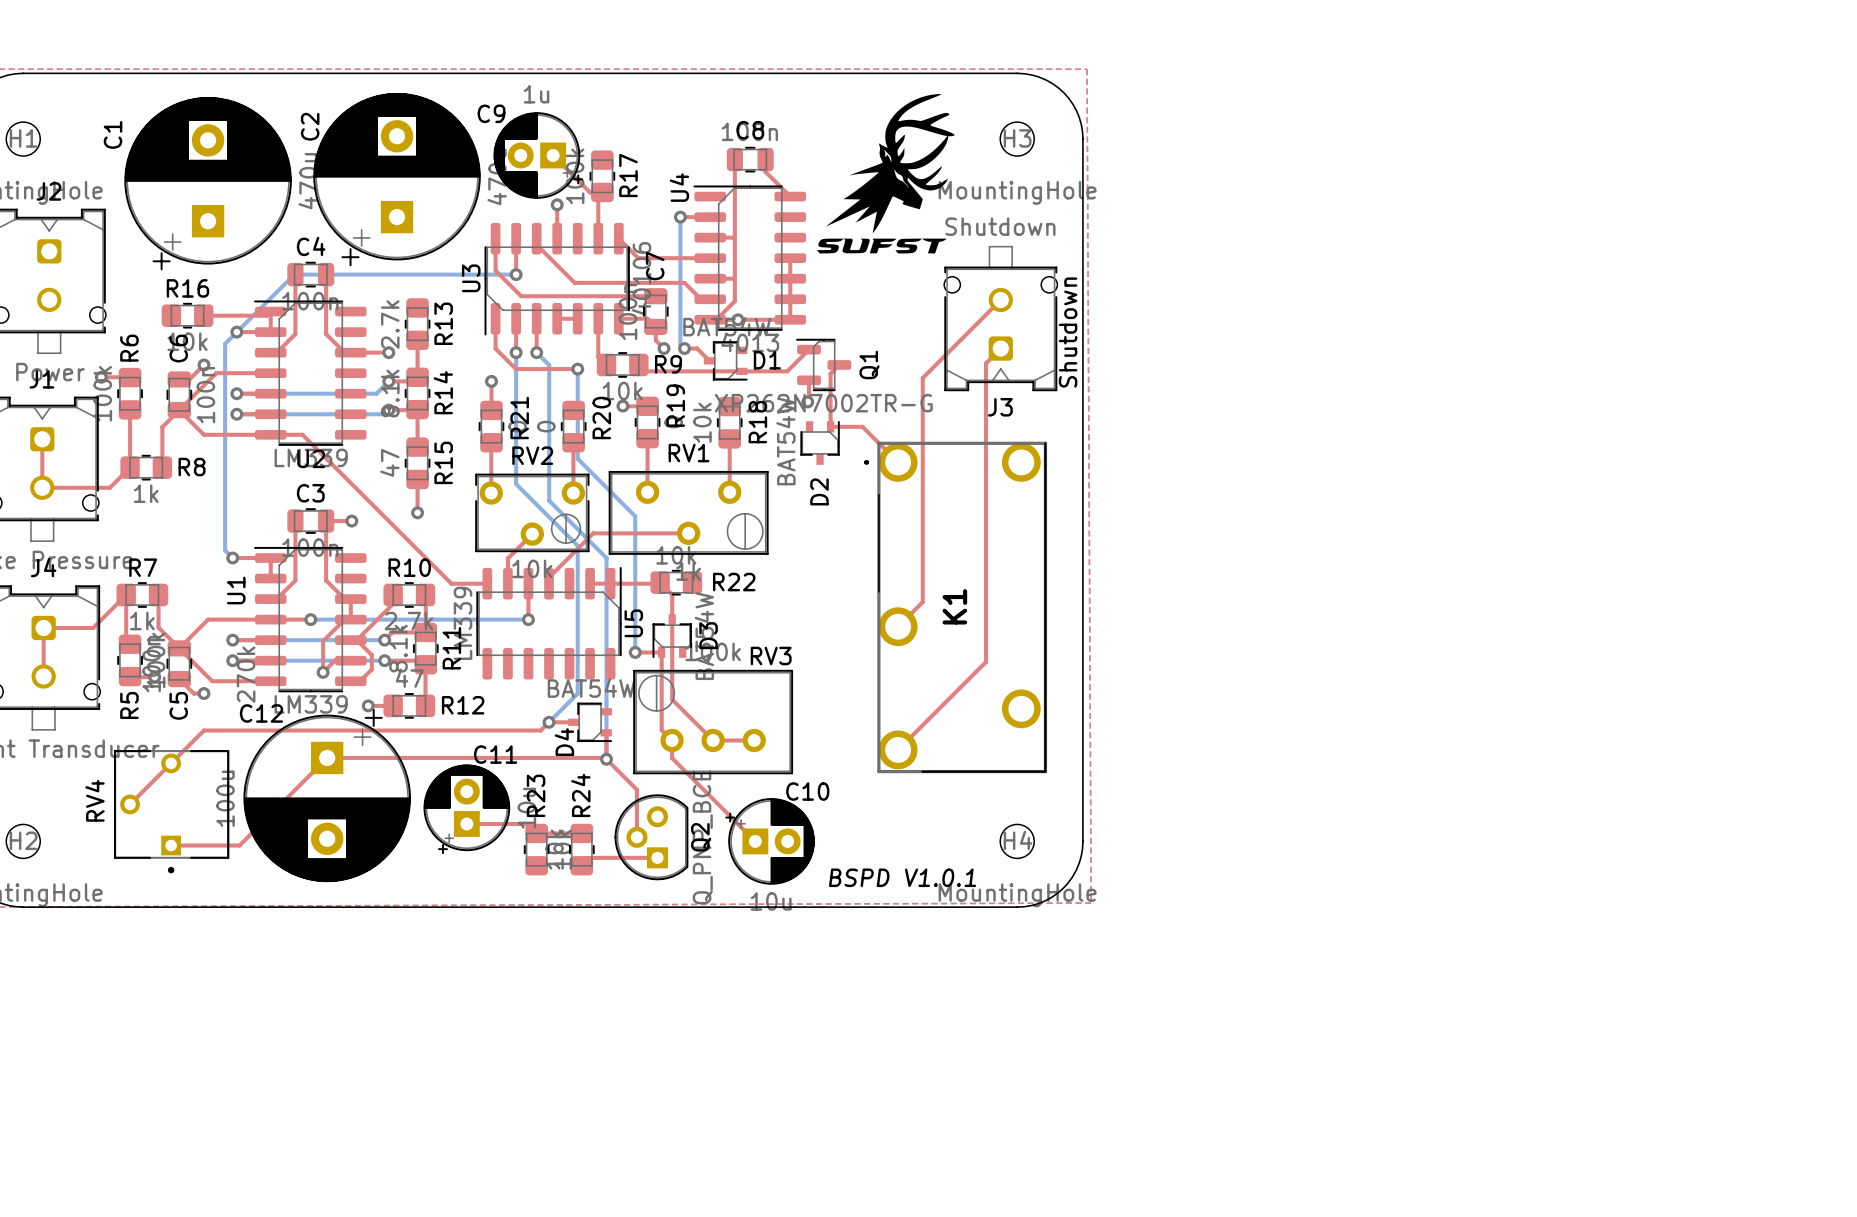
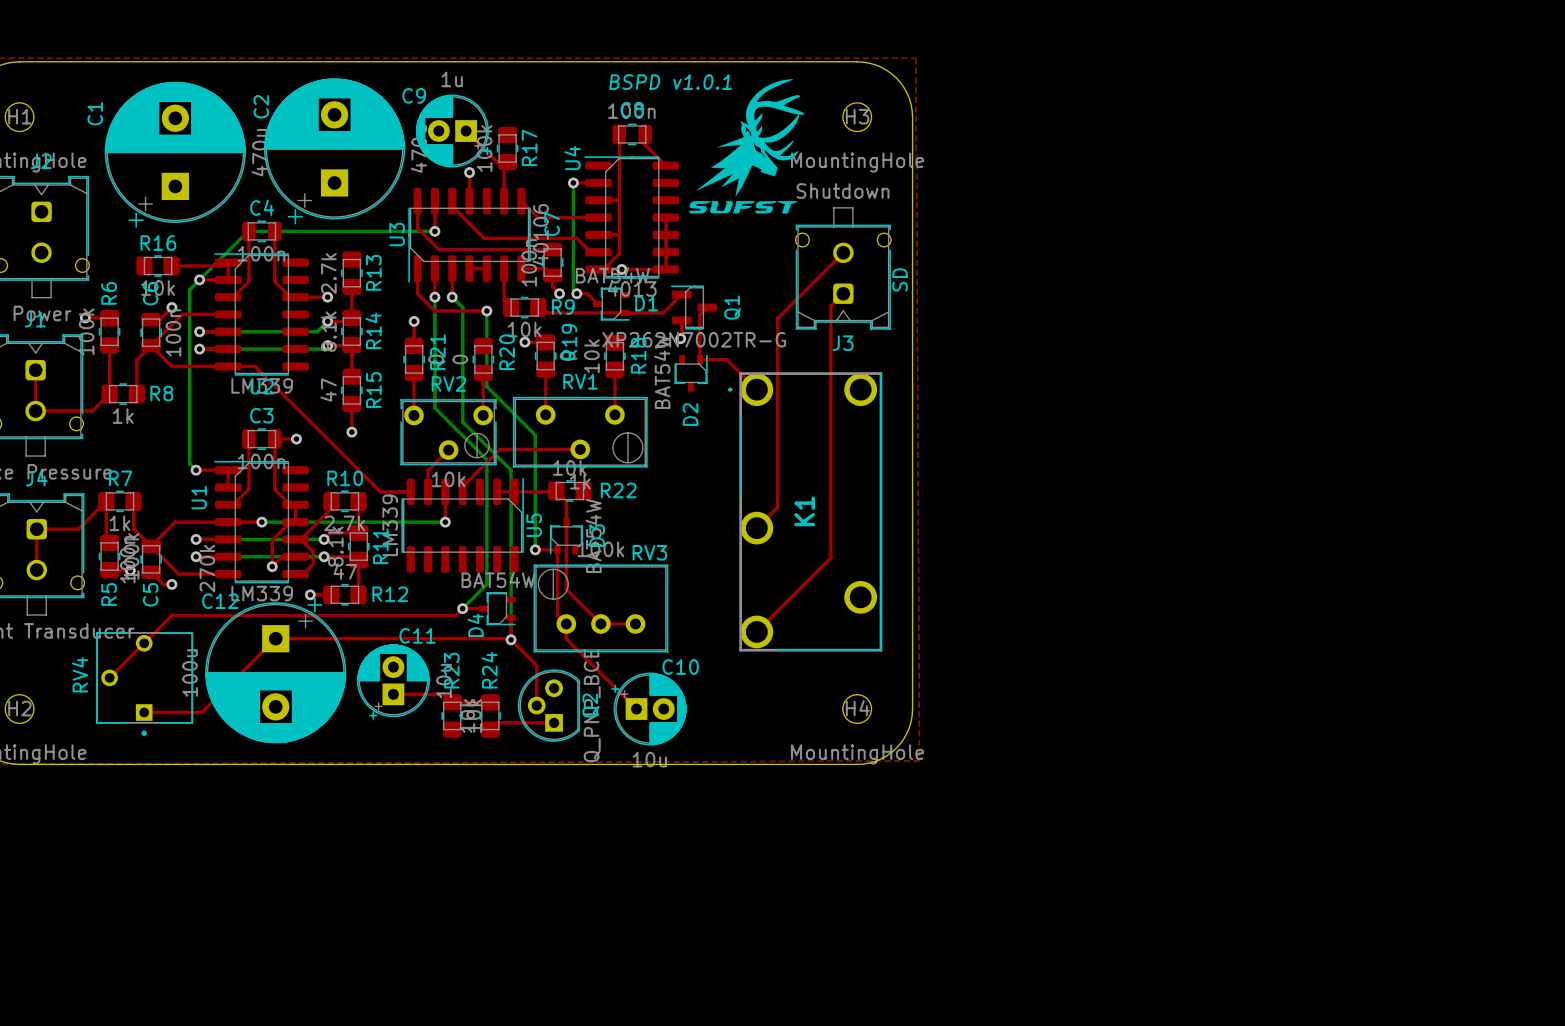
text: none -> BSPD v1.0.1 (670, 82)
text: Shutdown (1068, 332) -> SD (900, 279)
text: BSPD V1.0.1 (902, 877) -> none

